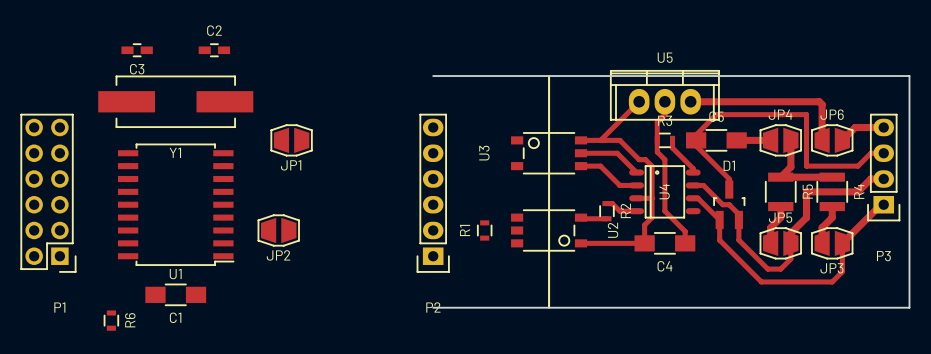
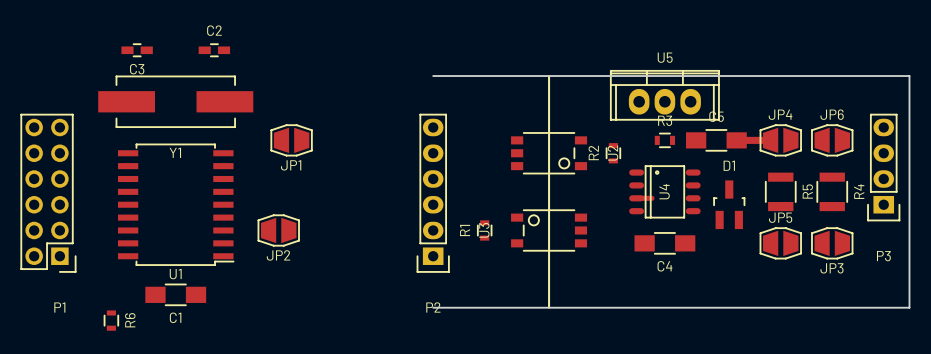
top track: (639, 101) (600, 140) -> none
top track: (664, 101) (664, 114) (657, 122) (657, 152) (664, 159) (664, 211) (685, 231) (685, 243) -> none
top track: (690, 101) (819, 101) (822, 104) (822, 140) -> none
top track: (883, 127) (855, 127) (842, 140) -> none
top track: (580, 140) (619, 140) (639, 159) (645, 159) (652, 166) (652, 217) (644, 225) (644, 243) (580, 243) -> none
top track: (672, 140) (672, 147) (693, 168) (693, 172) (690, 172) -> none
top track: (790, 140) (790, 167) (780, 177) (832, 177) -> none
U3 position: (549, 153) -> (549, 230)
top track: (580, 153) (617, 153) (636, 172) -> none
top track: (883, 153) (870, 153) (857, 166) (806, 166) (806, 114) (716, 114) (696, 134) (696, 145) (729, 178) (729, 189) -> none
top track: (580, 166) (600, 166) (619, 185) (636, 185) -> none
top track: (883, 178) (870, 178) (857, 191) (806, 191) (806, 217) (790, 233) (790, 258) (780, 269) (767, 269) (738, 240) (738, 214) (729, 204) (722, 204) (703, 185) (693, 185) -> none
top track: (693, 198) (697, 198) (719, 219) (719, 240) (761, 281) (832, 281) (842, 271) (842, 243) (881, 204) (883, 204) -> none
top track: (606, 203) (612, 203) (619, 211) (636, 211) -> none
top track: (780, 206) (780, 217) (770, 227) (770, 243) -> none
top track: (832, 206) (832, 217) (822, 227) (822, 243) -> none
R2 name position: R2 (625, 210) -> R2 (593, 152)
R2 position: (606, 211) -> (613, 153)
top track: (580, 217) (606, 218) -> none
U2 position: (549, 230) -> (549, 153)

